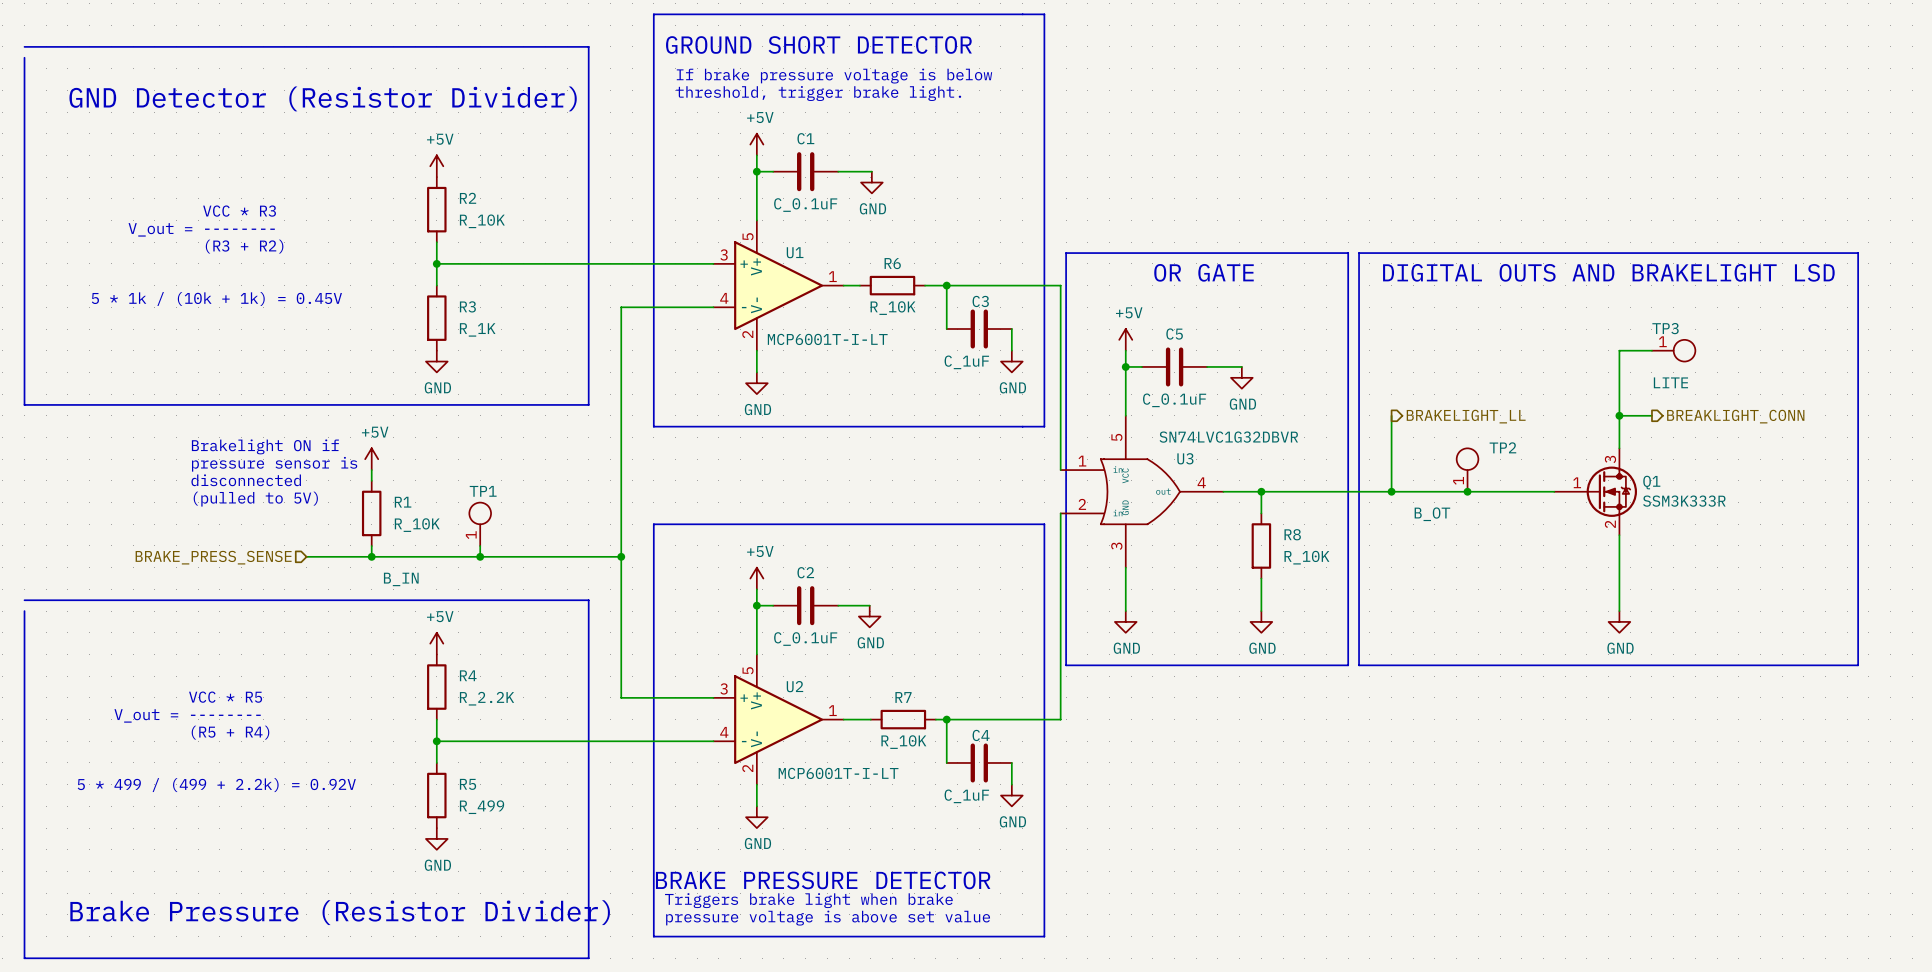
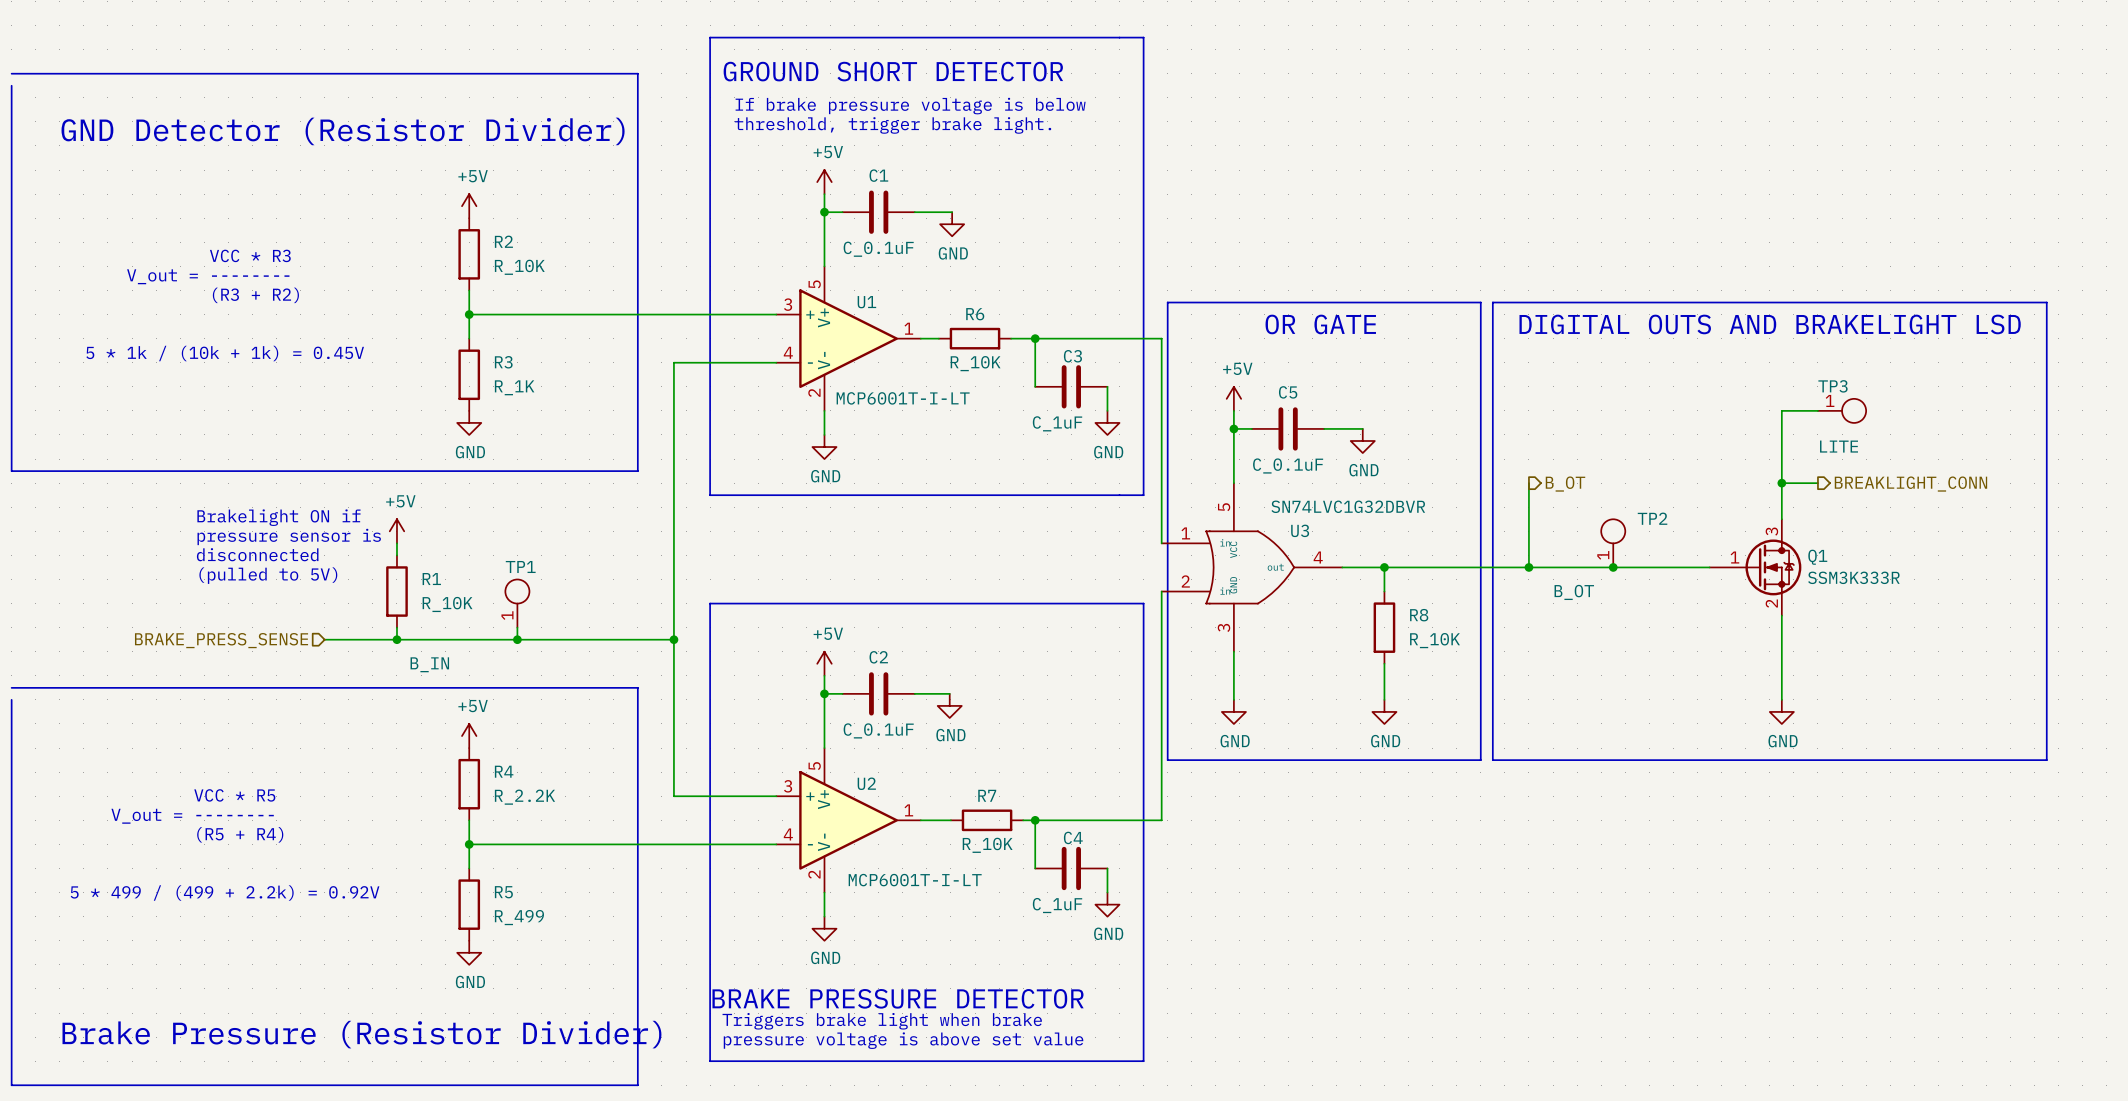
hierarchical label: BRAKELIGHT_LL (1466, 416) -> B_OT (1565, 484)

